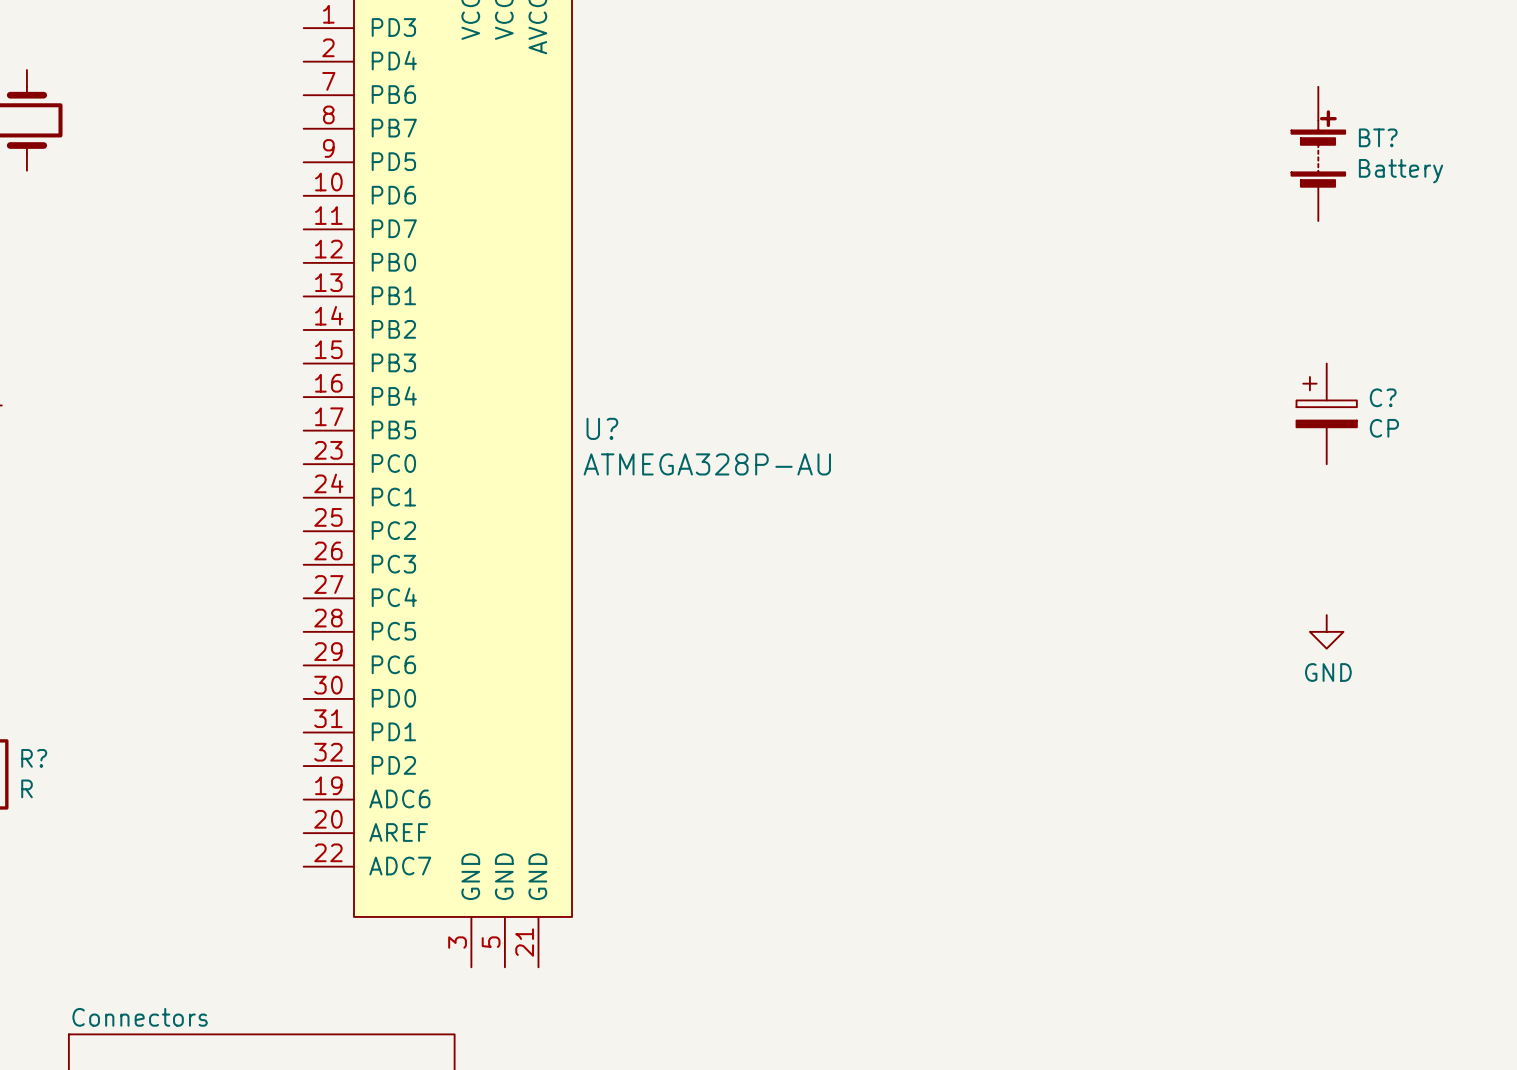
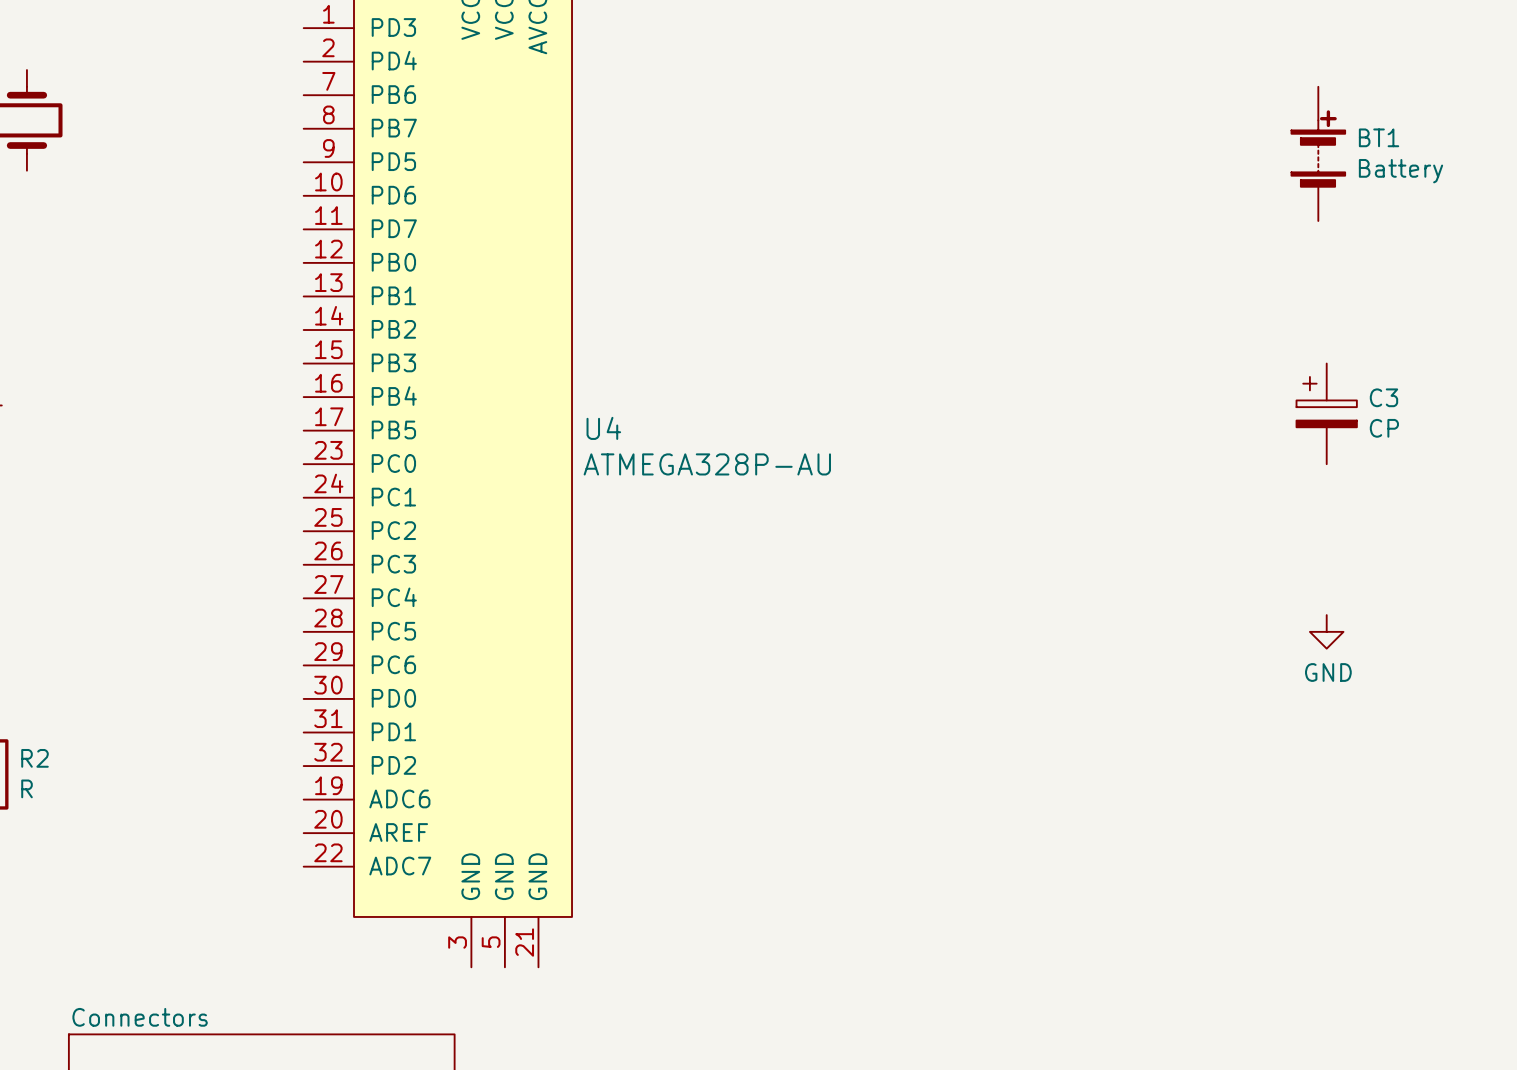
BT? name: BT? (1378, 137) -> BT1 (1379, 137)
C? name: C? (1383, 397) -> C3 (1383, 397)
U? name: U? (602, 428) -> U4 (603, 428)
R? name: R? (34, 758) -> R2 (34, 758)

